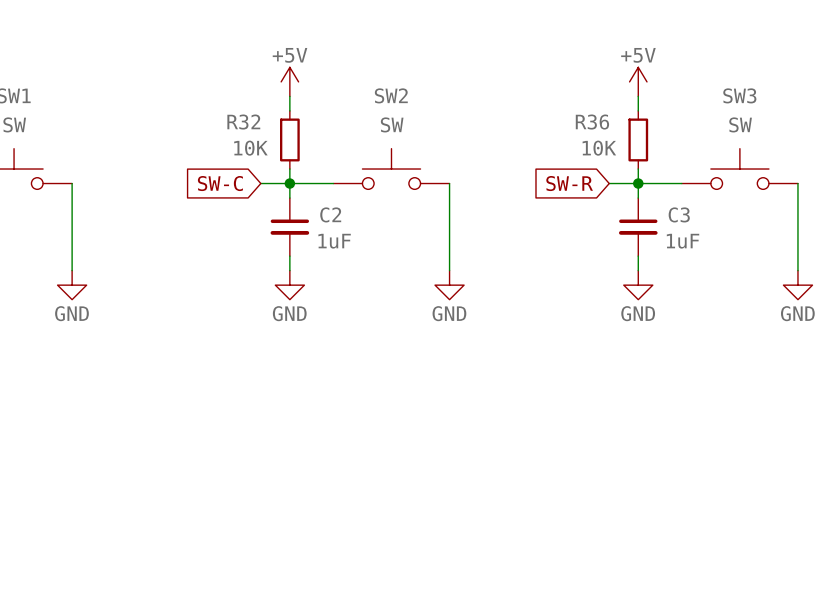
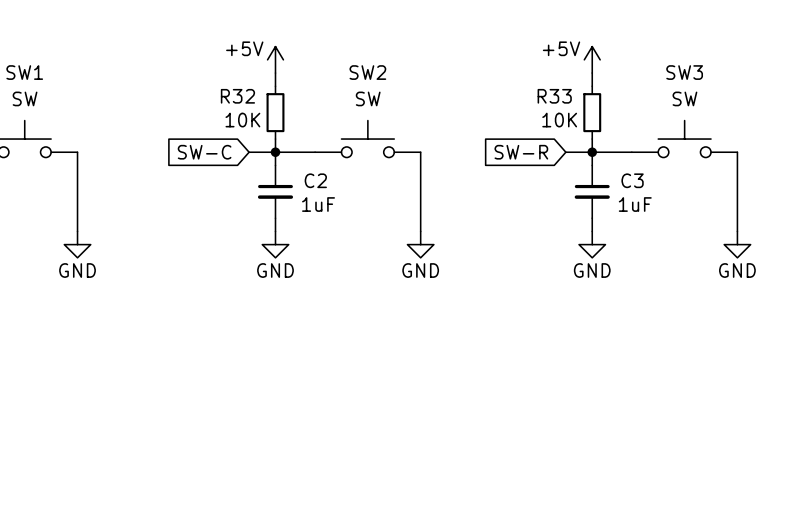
power symbol text position: +5V (290, 55) -> +5V (244, 48)
power symbol text position: +5V (638, 55) -> +5V (561, 48)
R36 name: R36 (592, 122) -> R33 (554, 96)

